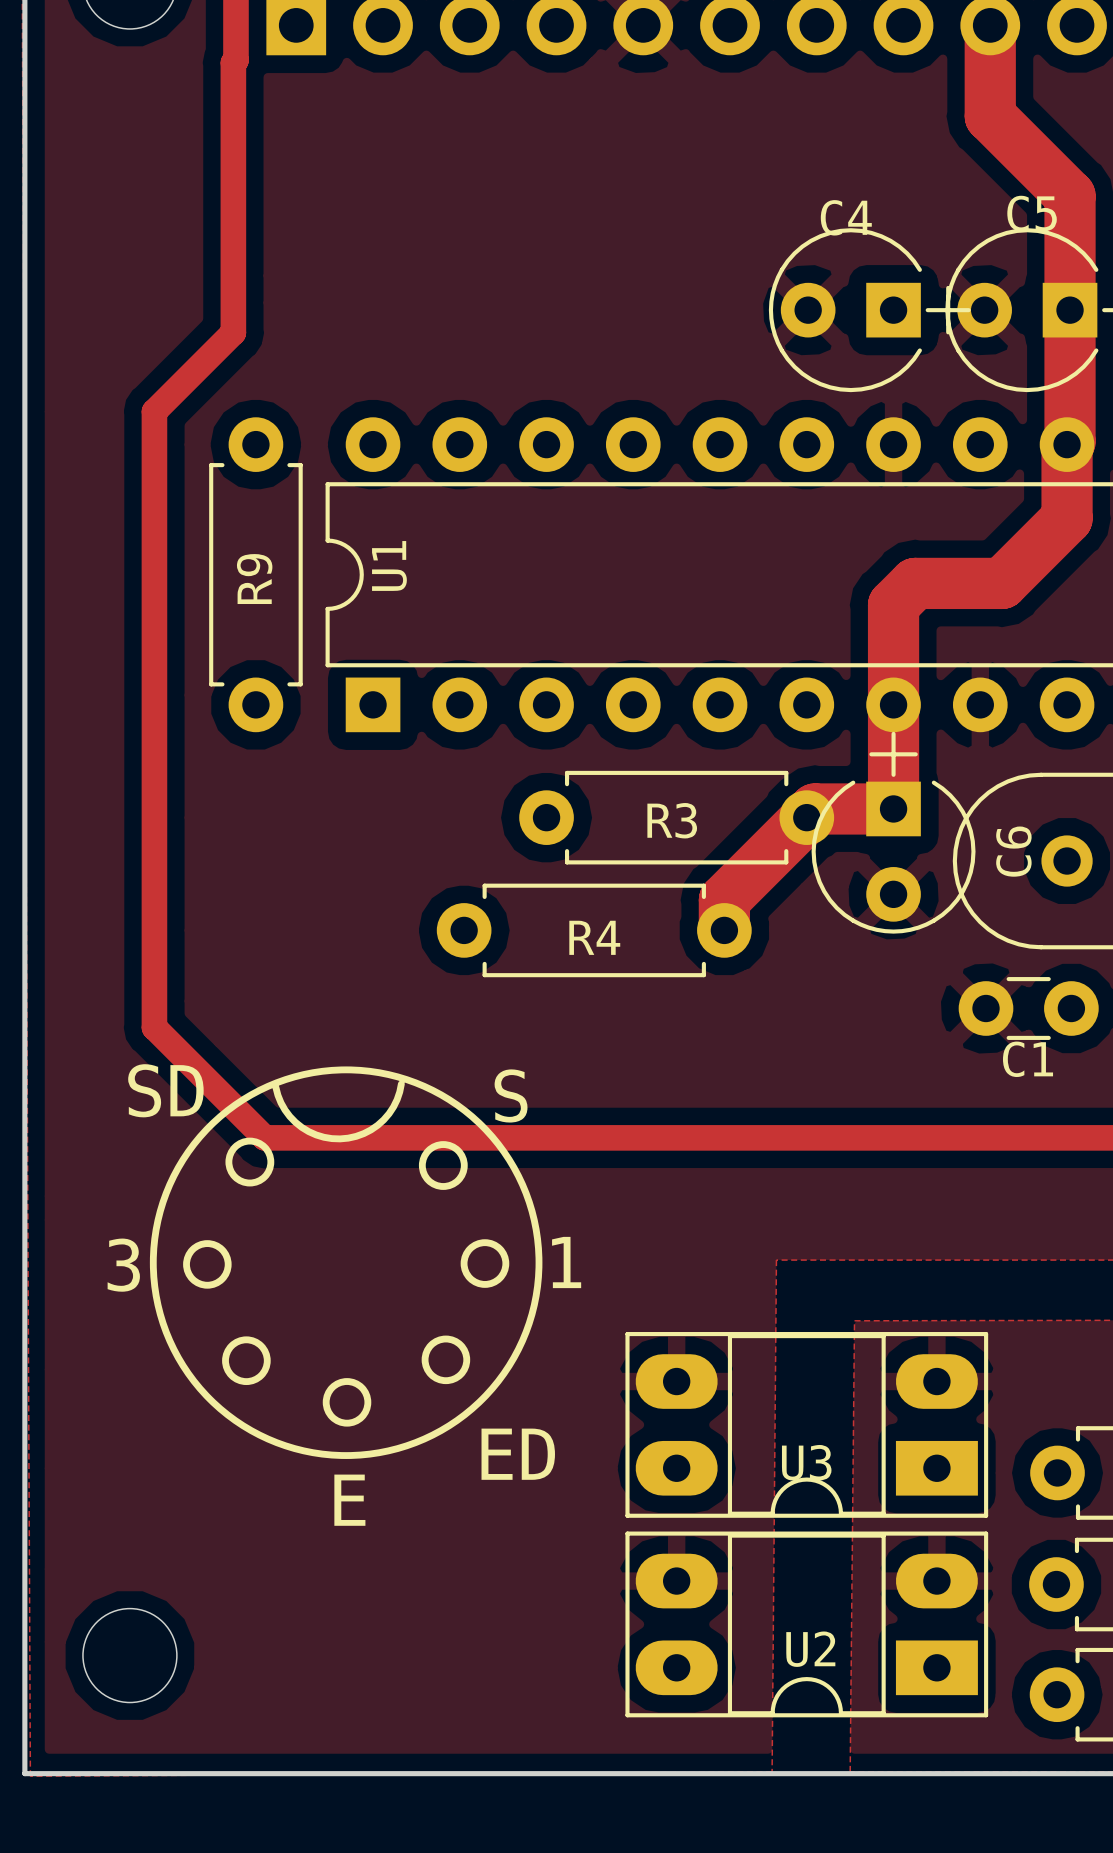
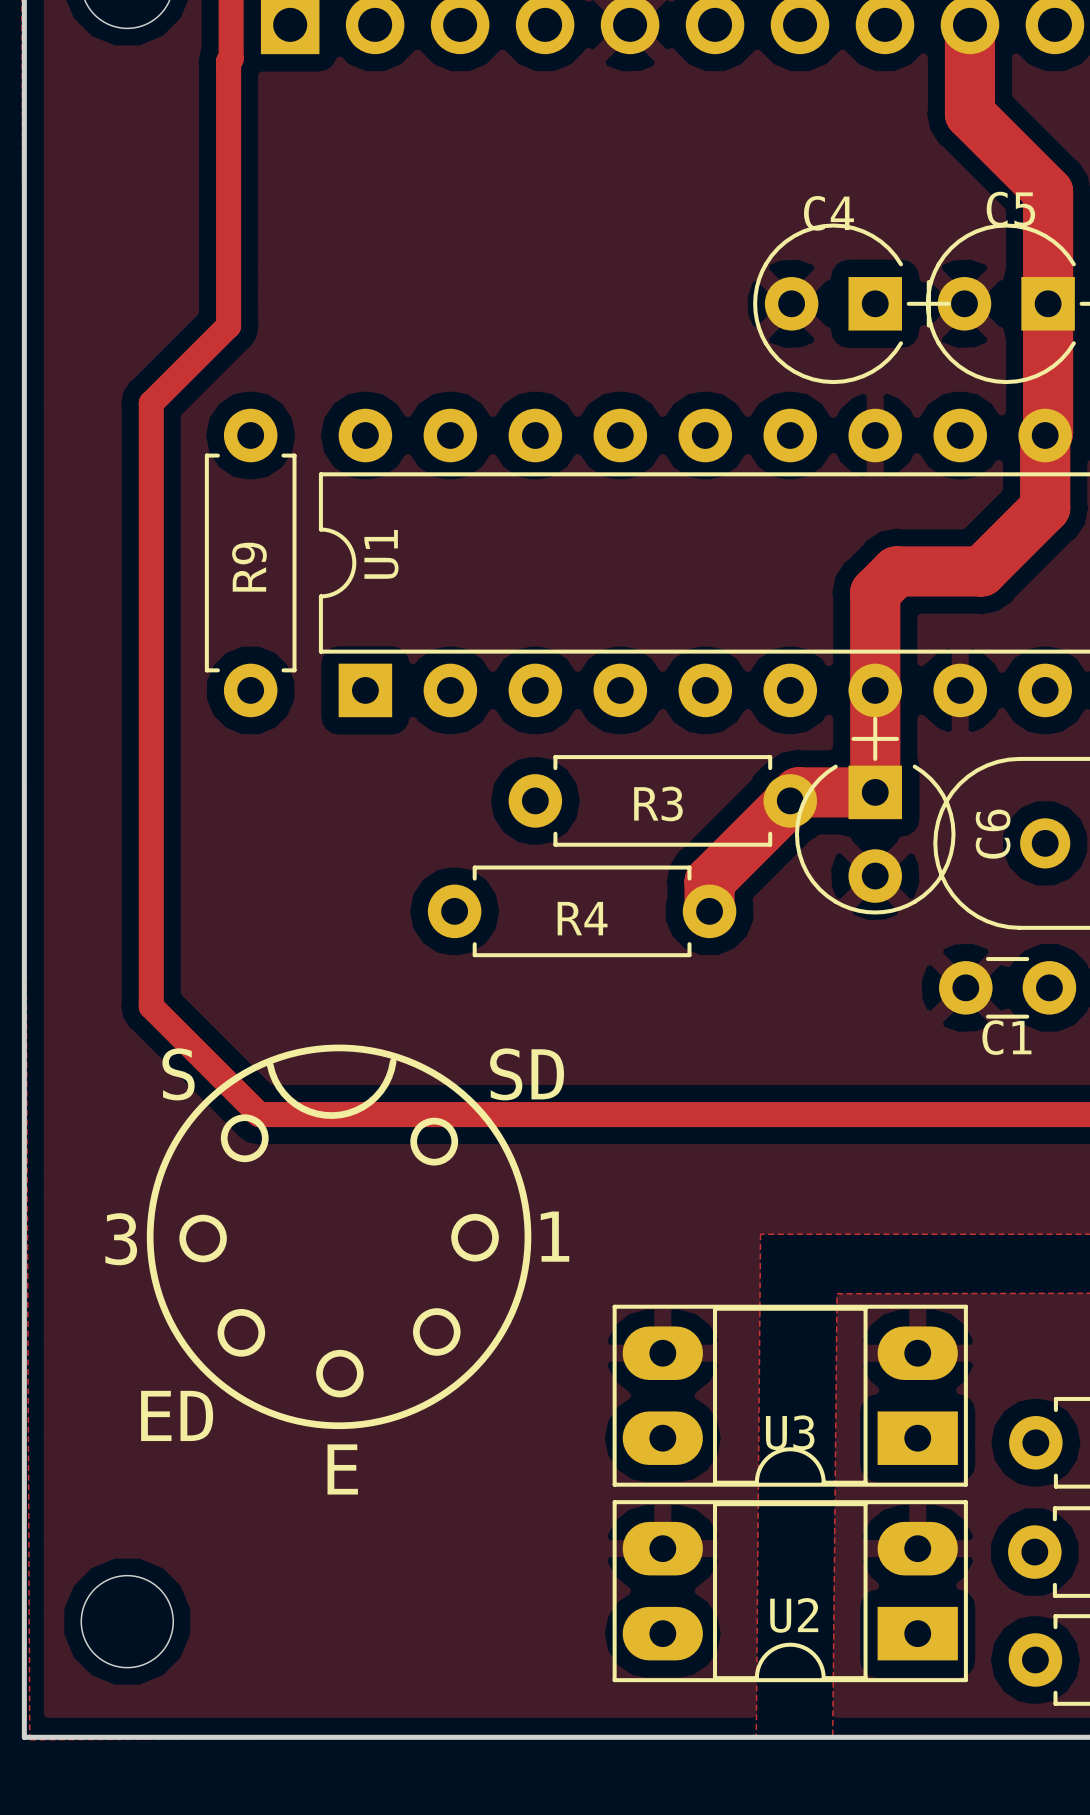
text: SD (165, 1090) -> S (178, 1074)
text: S (511, 1095) -> SD (527, 1074)
text position: ED (518, 1454) -> ED (177, 1415)

